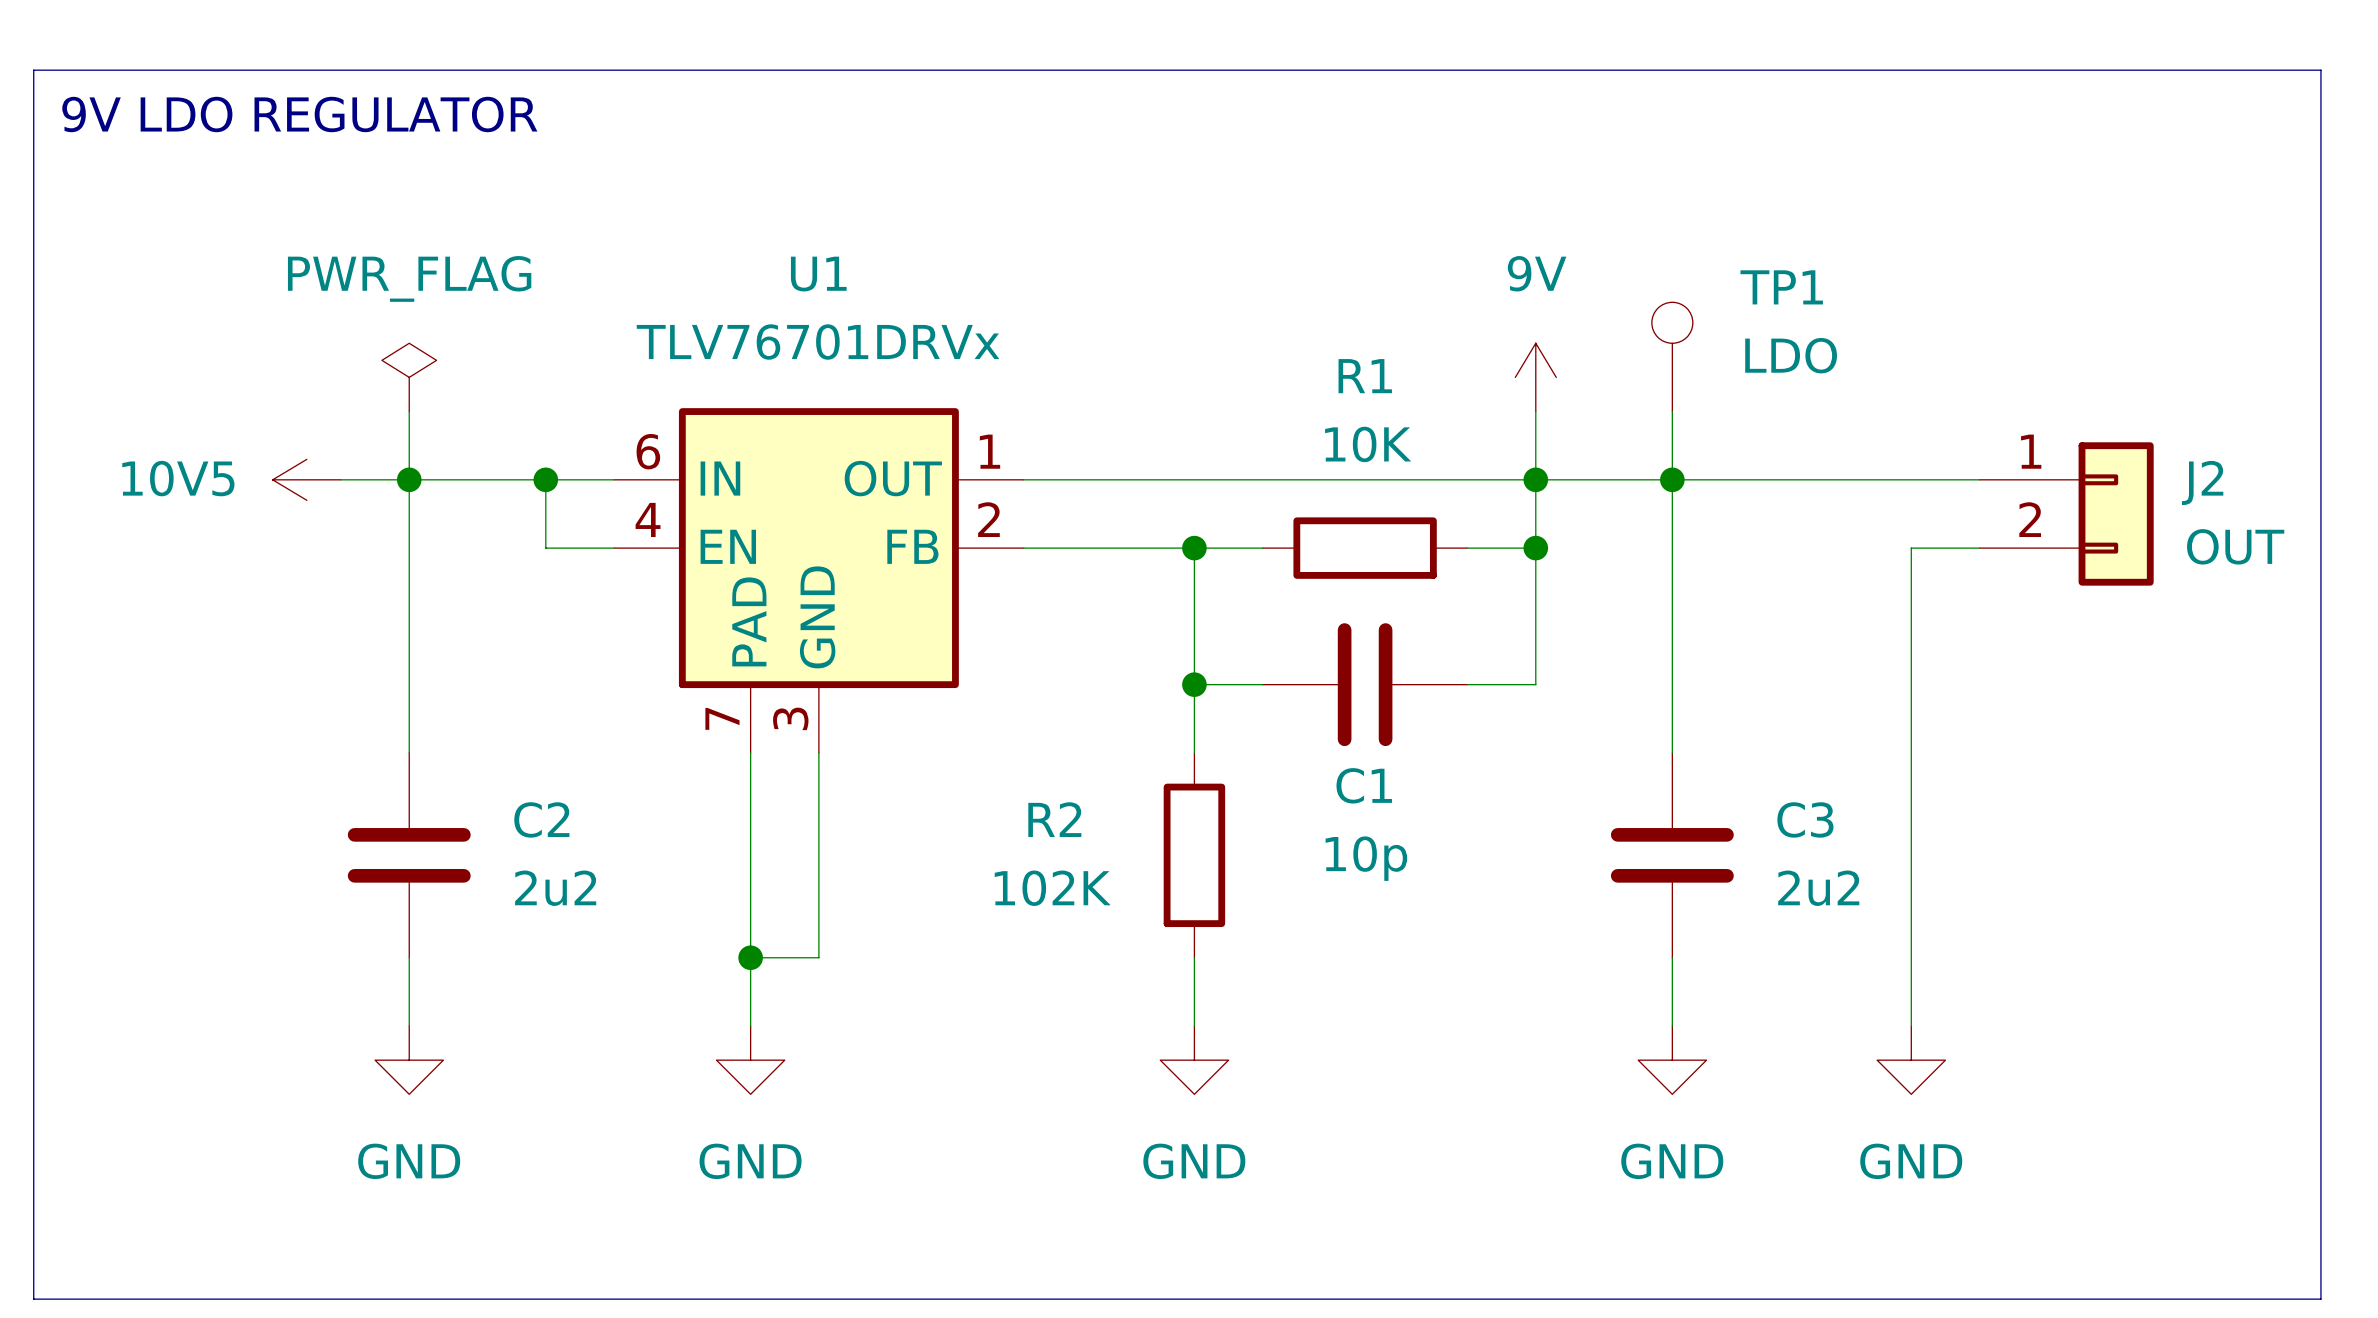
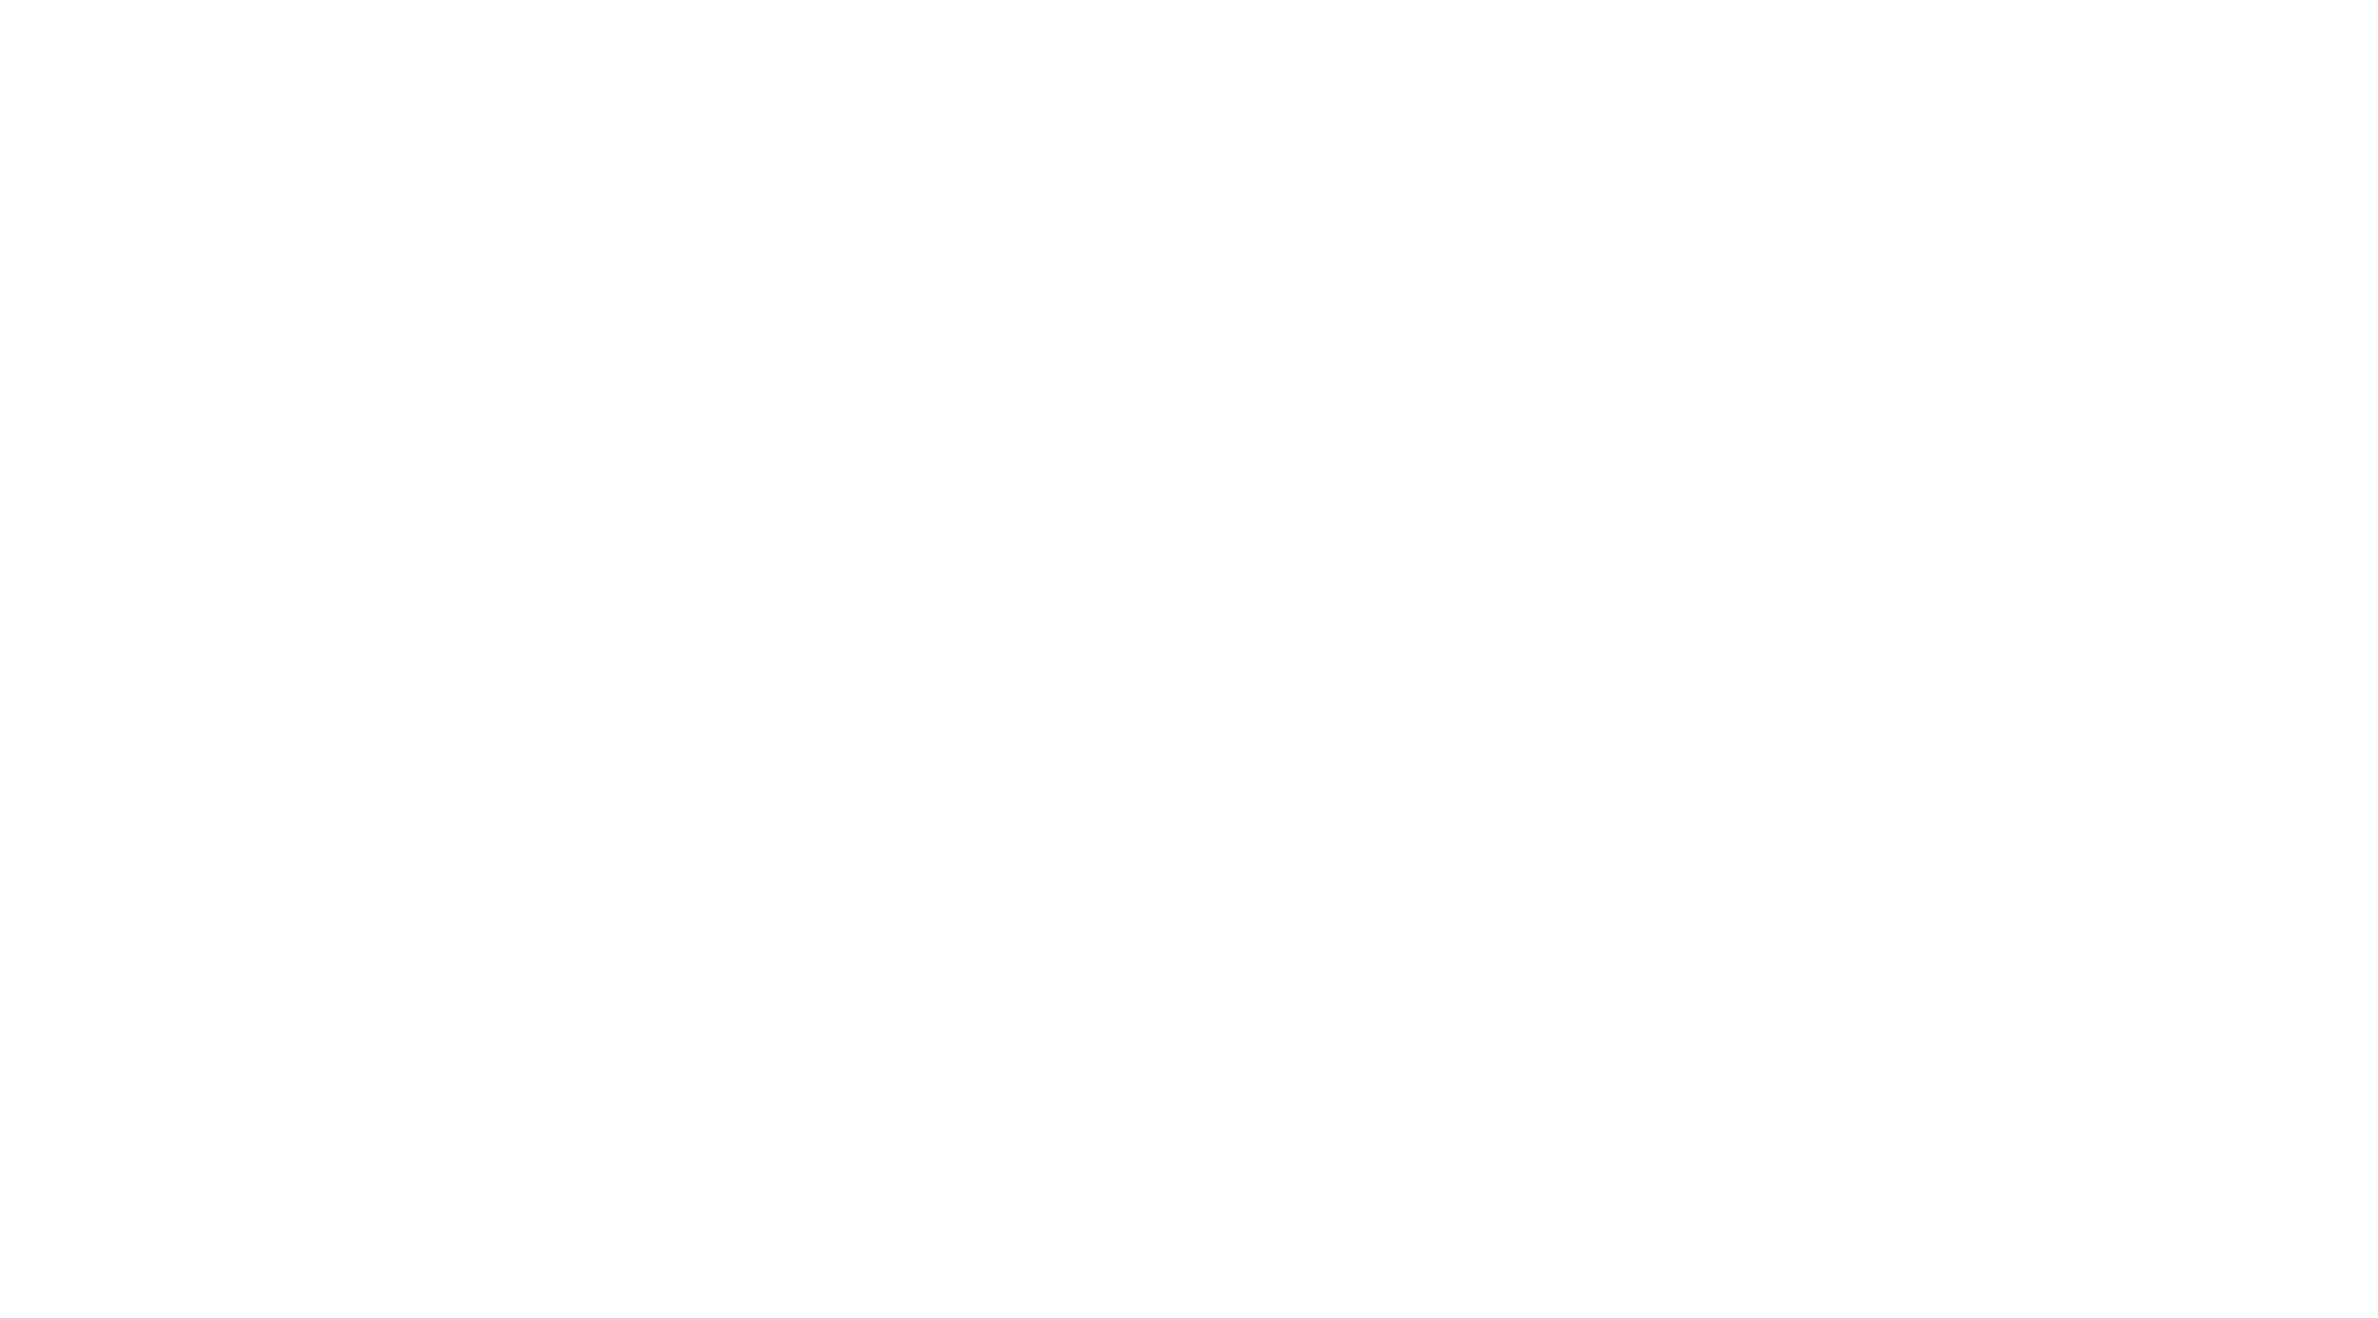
line: (33, 70) (2320, 70) (2320, 1299) (33, 1299) (33, 70) -> none
text: 9V LDO REGULATOR (299, 114) -> none
TP1: LDO (1672, 356) -> none
power symbol: PWR_FLAG (409, 377) -> none
power symbol: 9V (1535, 377) -> none
wire: (409, 411) (409, 752) -> none
wire: (1535, 411) (1535, 684) (1467, 684) -> none
wire: (1672, 411) (1672, 752) -> none
power symbol: 10V5 (306, 479) -> none
wire: (340, 479) (614, 479) -> none
junction: (409, 479) -> none
wire: (545, 479) (545, 548) (614, 548) -> none
junction: (545, 479) -> none
wire: (1023, 479) (1979, 479) -> none
junction: (1535, 479) -> none
junction: (1672, 479) -> none
J2: OUT (2066, 513) -> none
wire: (1023, 548) (1262, 548) -> none
wire: (1194, 548) (1194, 752) -> none
junction: (1194, 548) -> none
R1: 10K (1365, 548) -> none
wire: (1467, 548) (1535, 548) -> none
junction: (1535, 548) -> none
wire: (1979, 548) (1911, 548) (1911, 1026) -> none
U1: TLV76701DRVx (818, 580) -> none
wire: (1194, 684) (1262, 684) -> none
junction: (1194, 684) -> none
C1: 10p (1365, 684) -> none
wire: (750, 752) (750, 1026) -> none
wire: (818, 752) (818, 957) (750, 957) -> none
C2: 2u2 (409, 855) -> none
R2: 102K (1194, 855) -> none
C3: 2u2 (1672, 855) -> none
wire: (409, 957) (409, 1026) -> none
junction: (750, 957) -> none
wire: (1194, 957) (1194, 1026) -> none
wire: (1672, 957) (1672, 1026) -> none
power symbol: GND (409, 1060) -> none
power symbol: GND (750, 1060) -> none
power symbol: GND (1194, 1060) -> none
power symbol: GND (1672, 1060) -> none
power symbol: GND (1911, 1060) -> none

